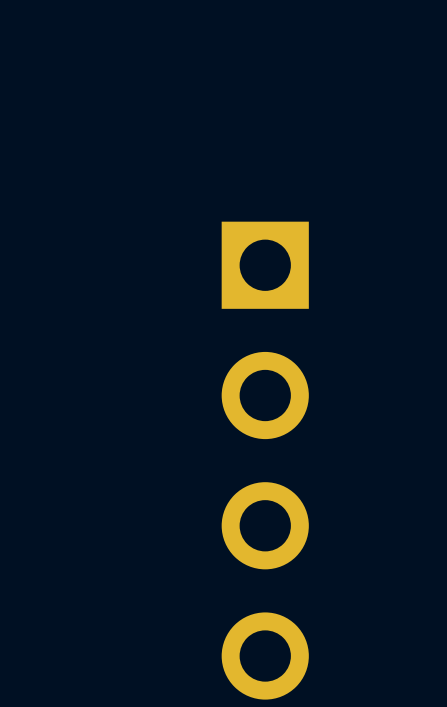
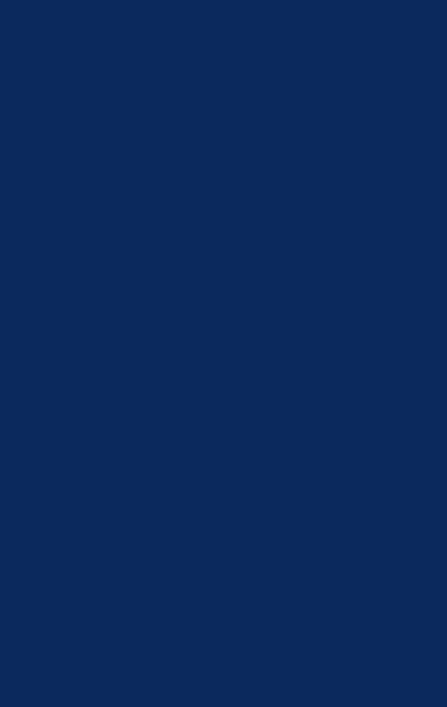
part: (265, 460) -> none

